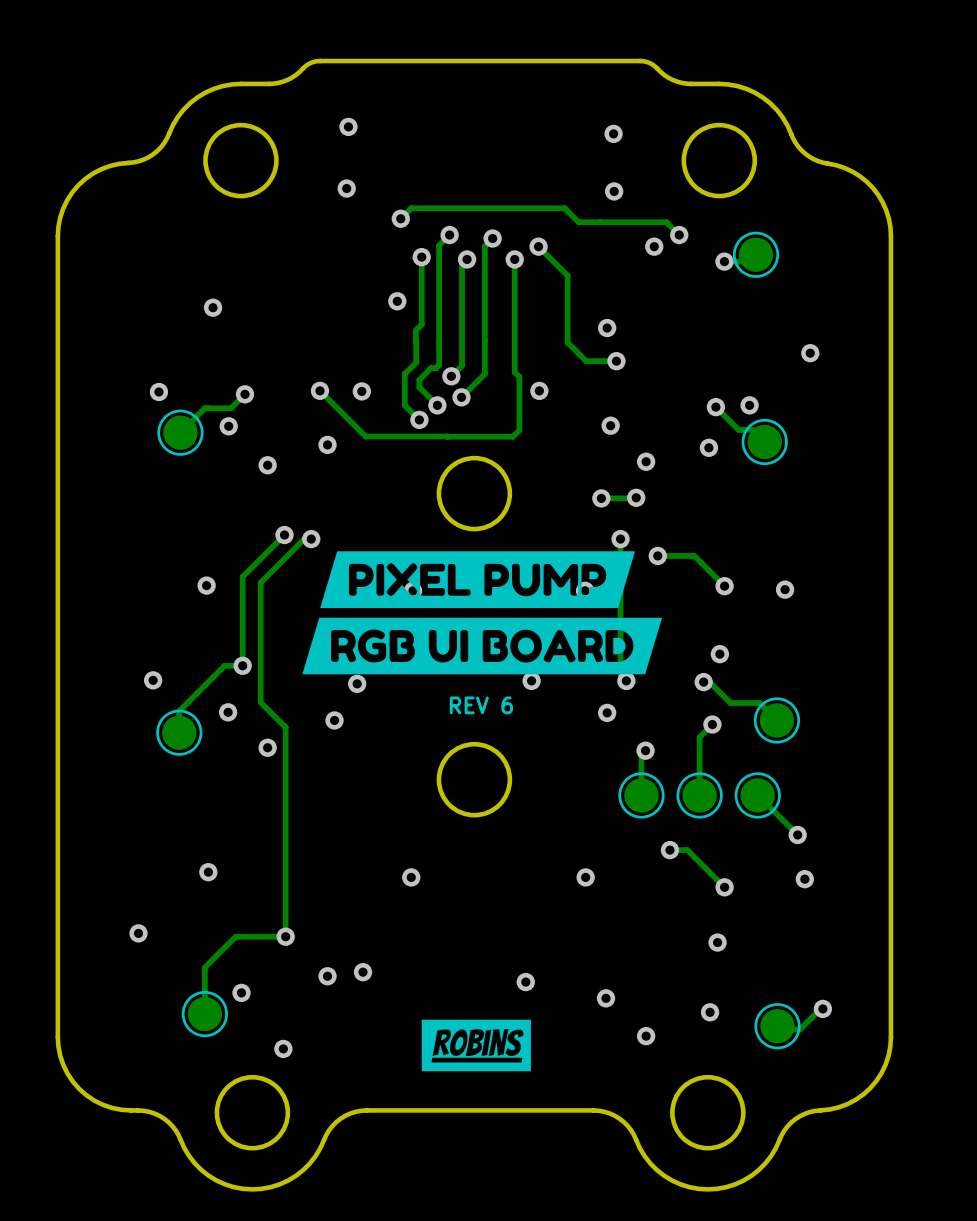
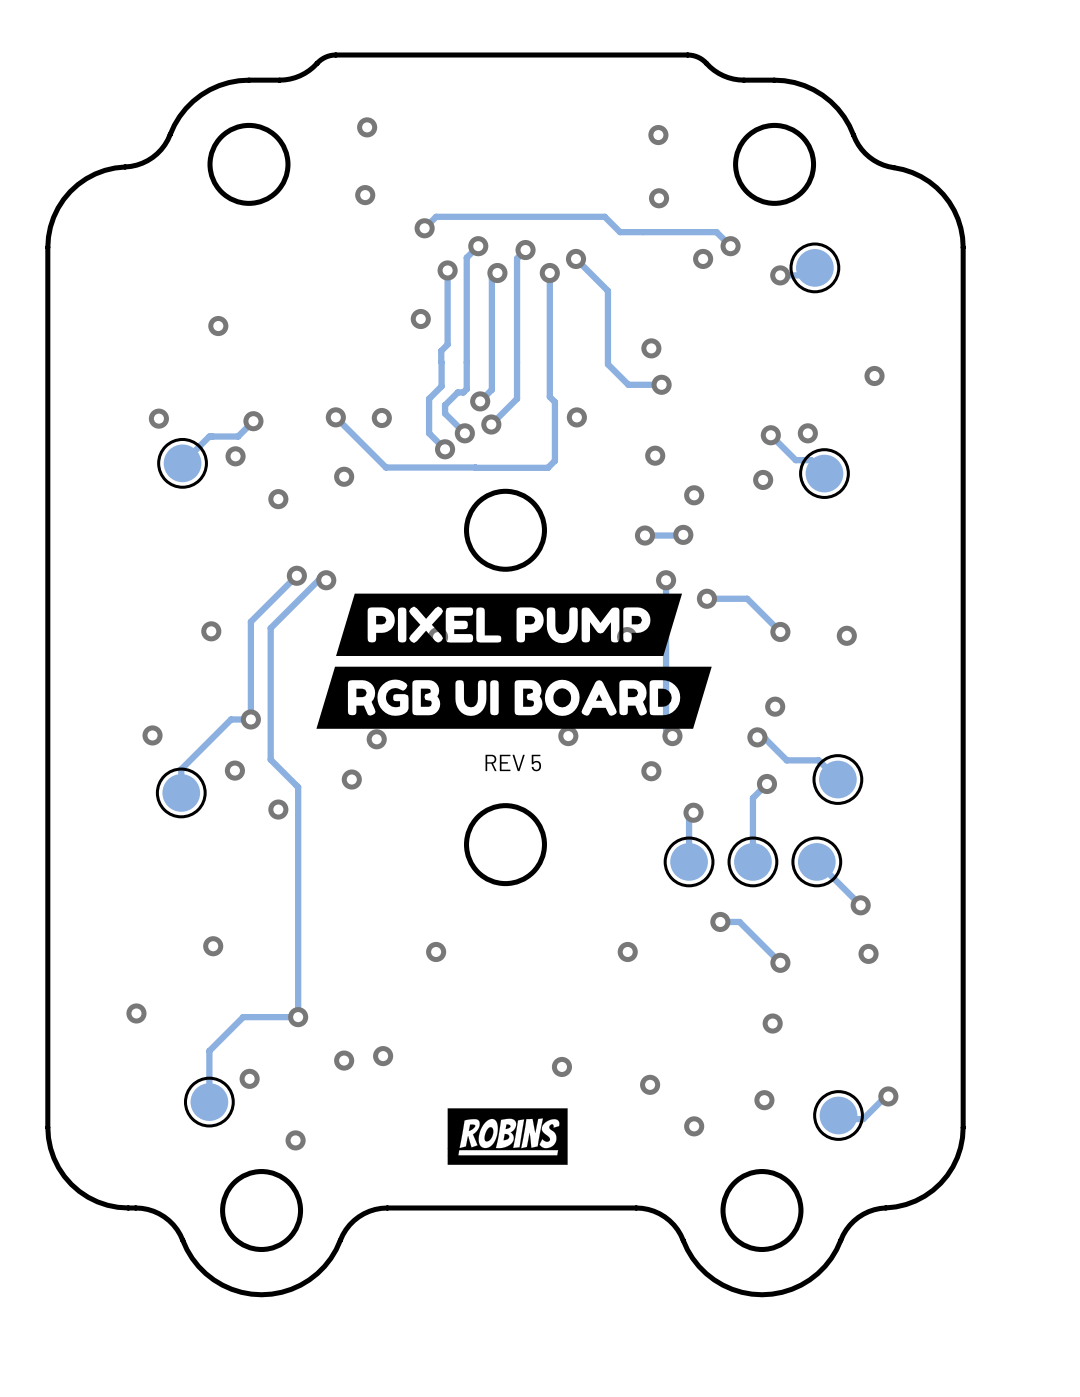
text: REV 6 (481, 705) -> REV 5 (513, 763)

